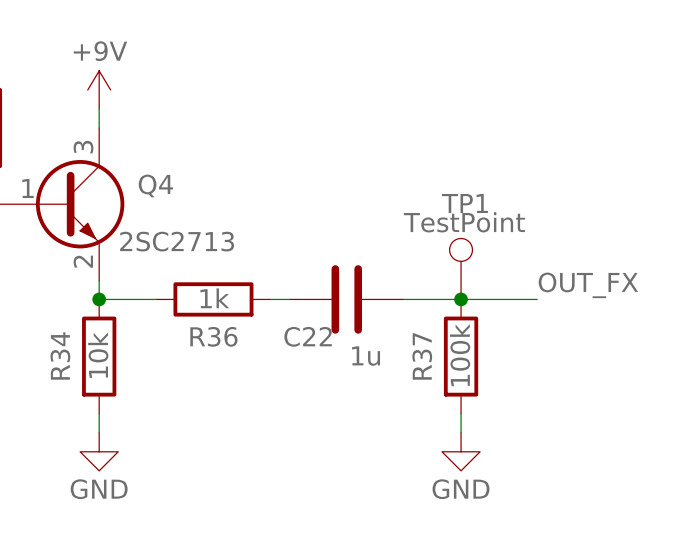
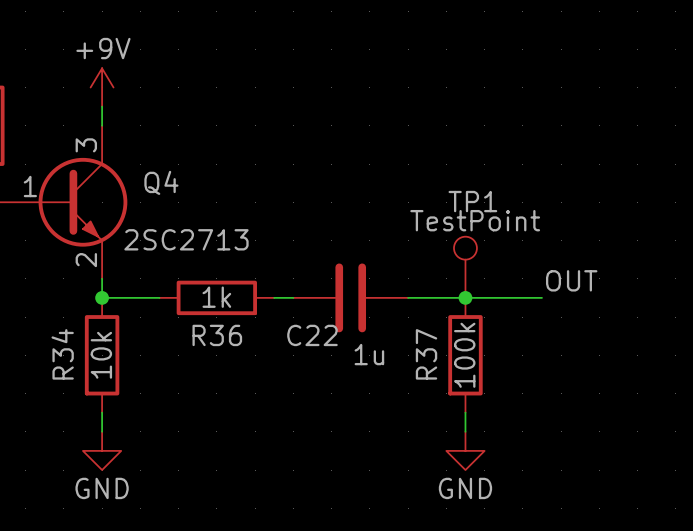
label: OUT_FX (588, 285) -> OUT (571, 280)

